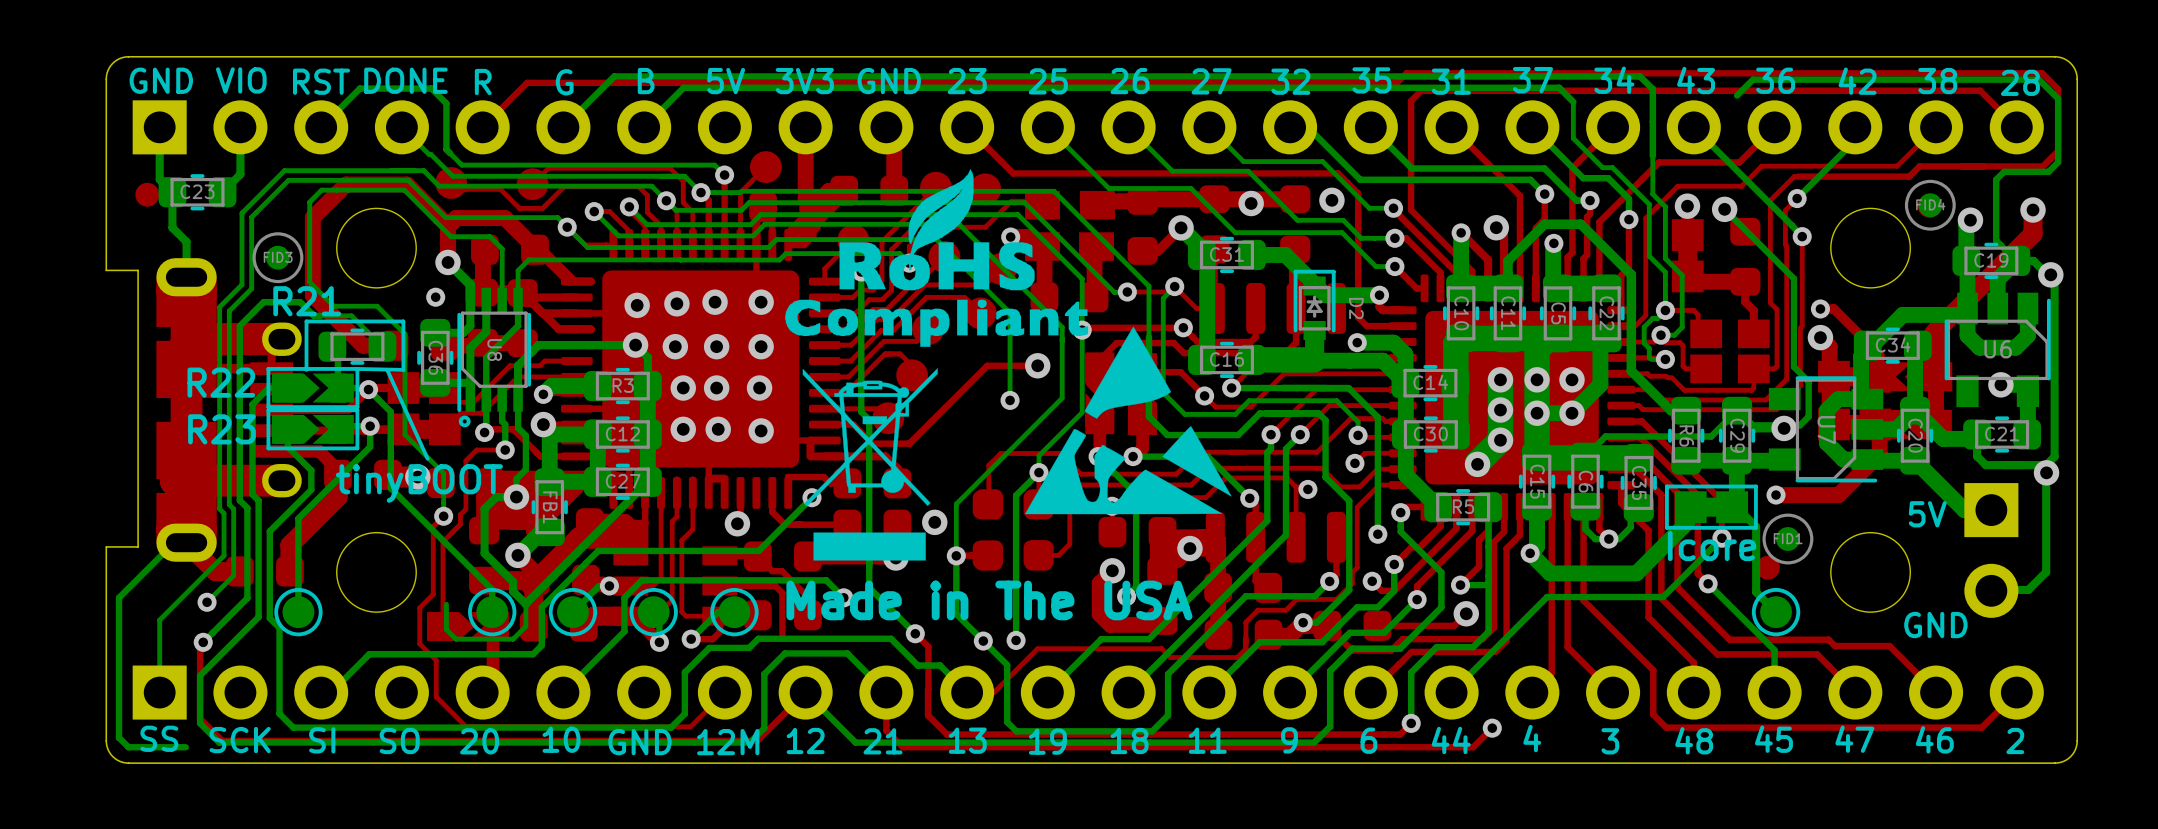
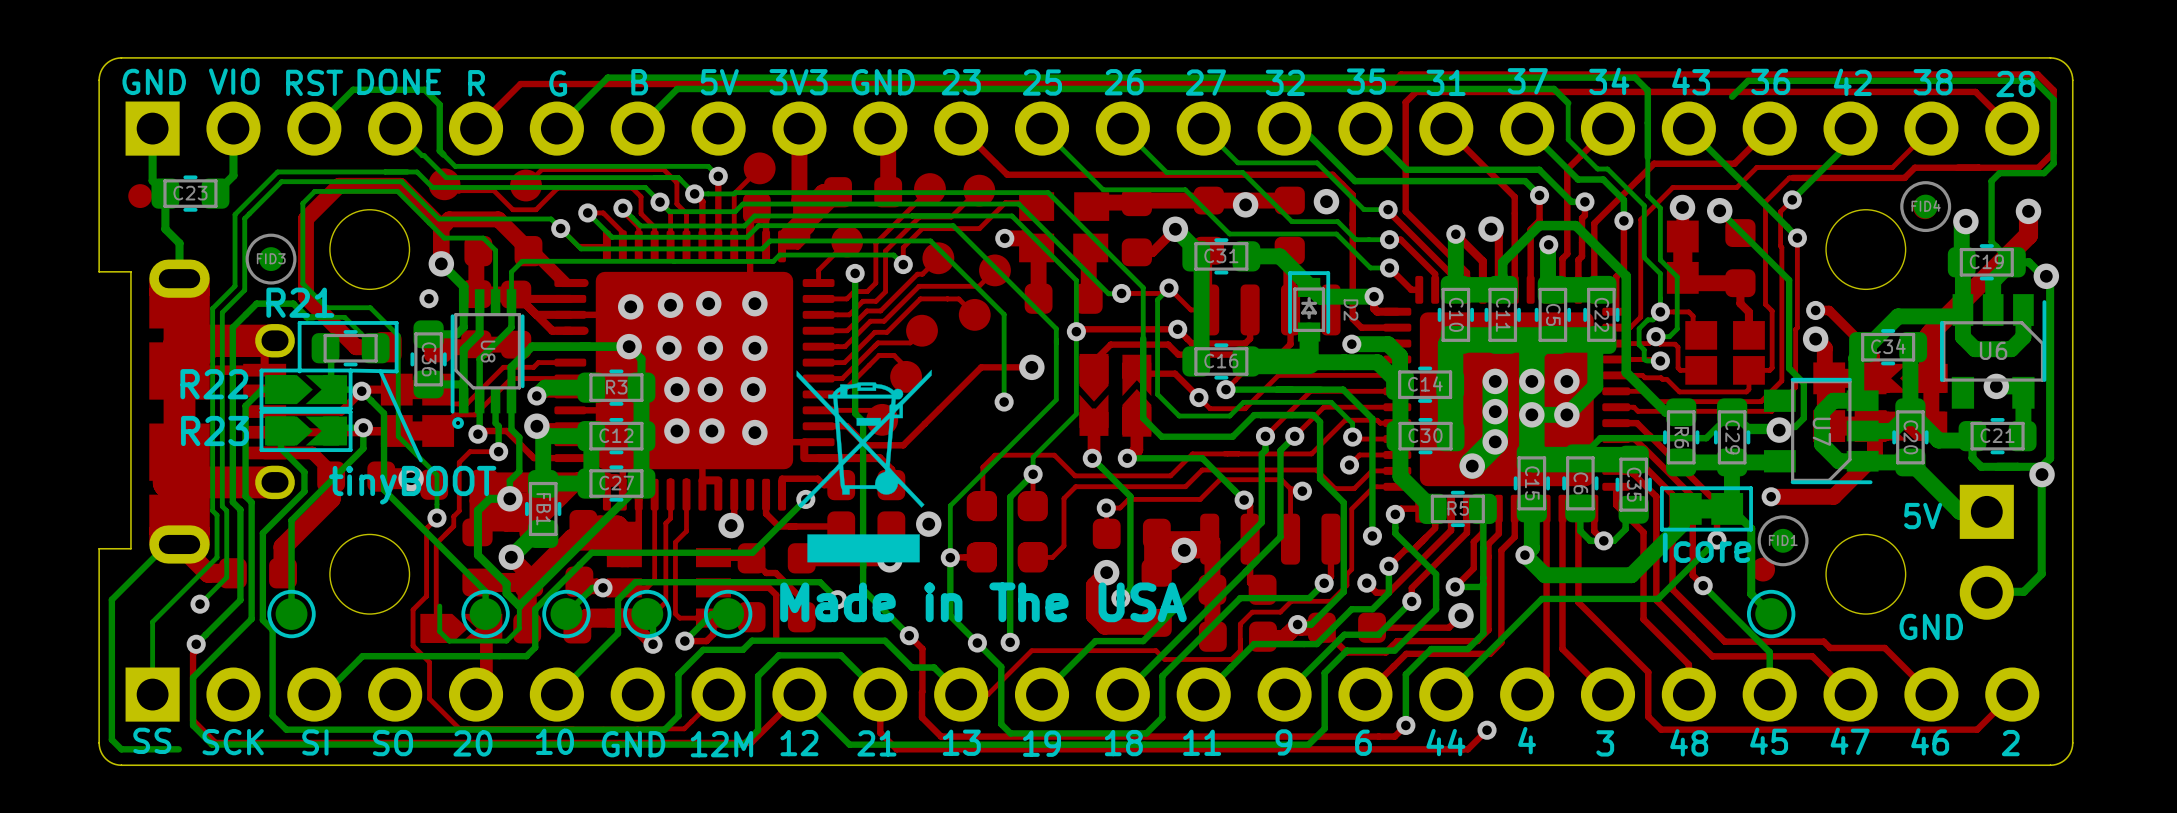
drawing: [785, 168, 1232, 515] -> none

